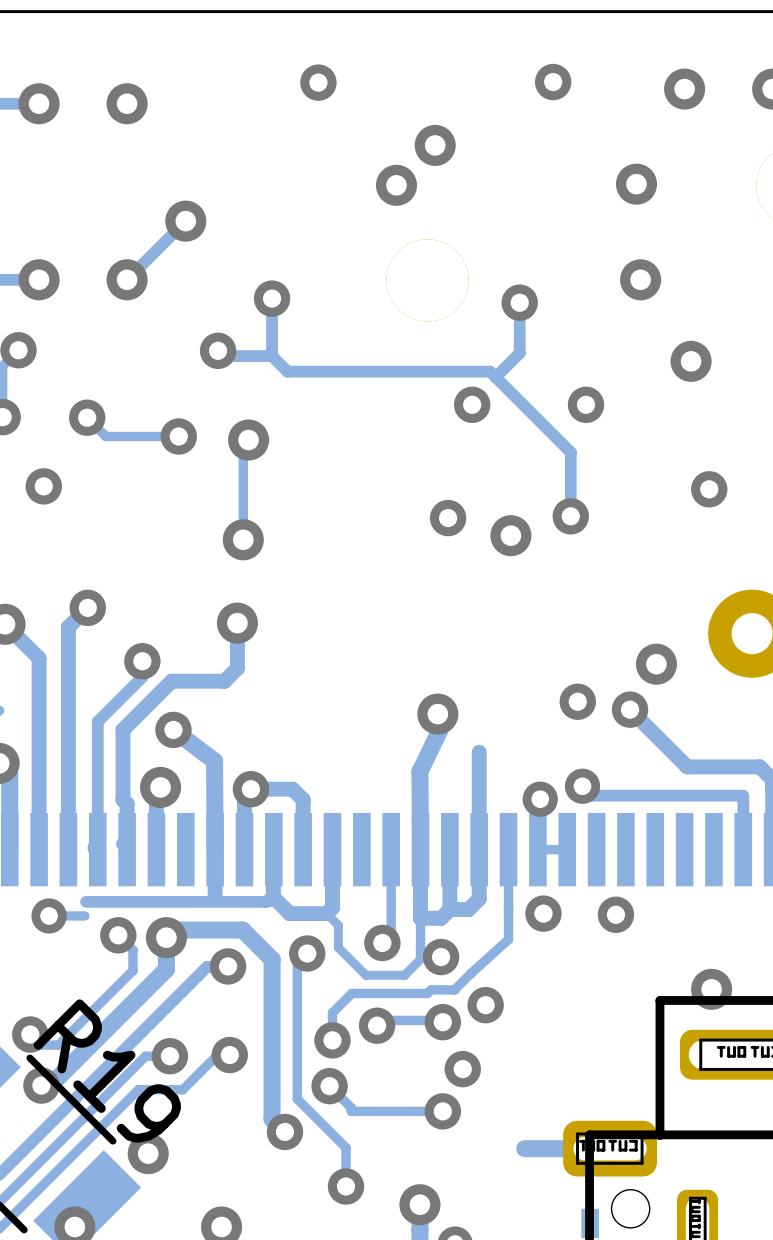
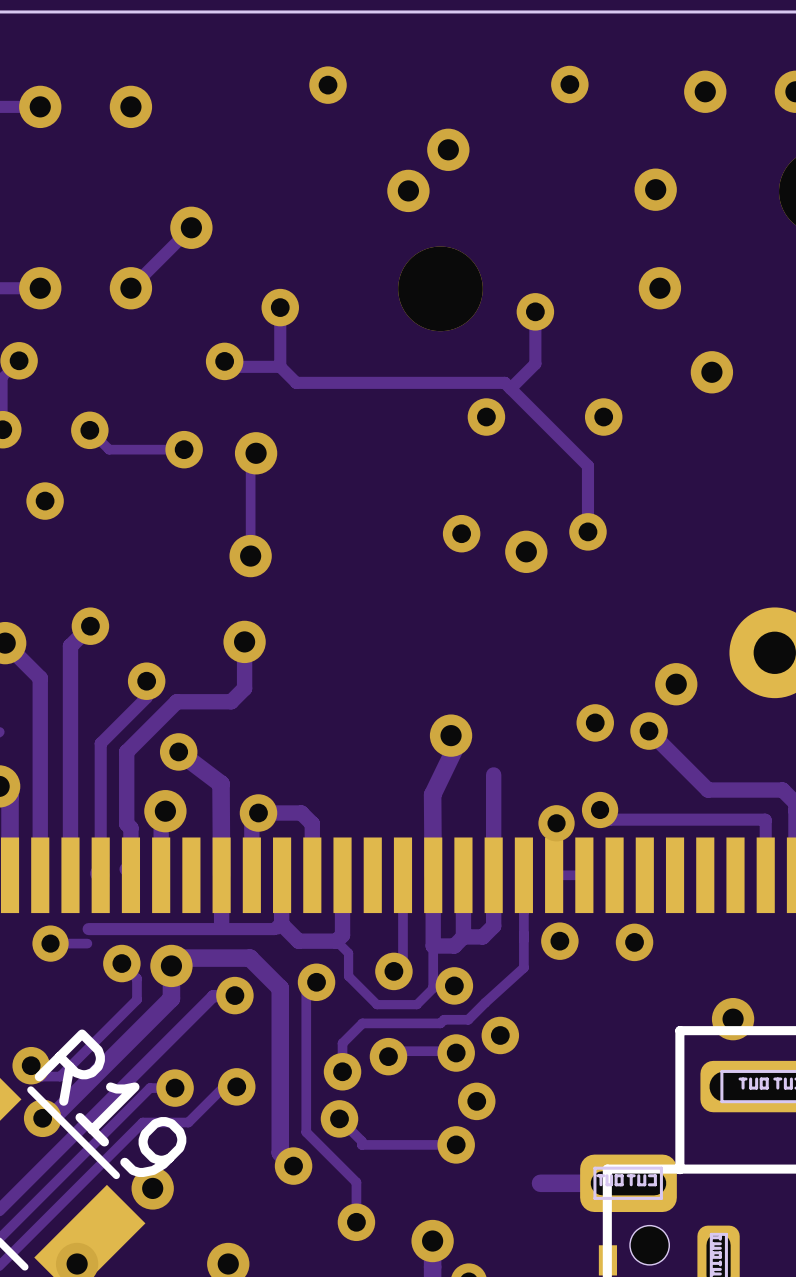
via: (709, 489) -> none

